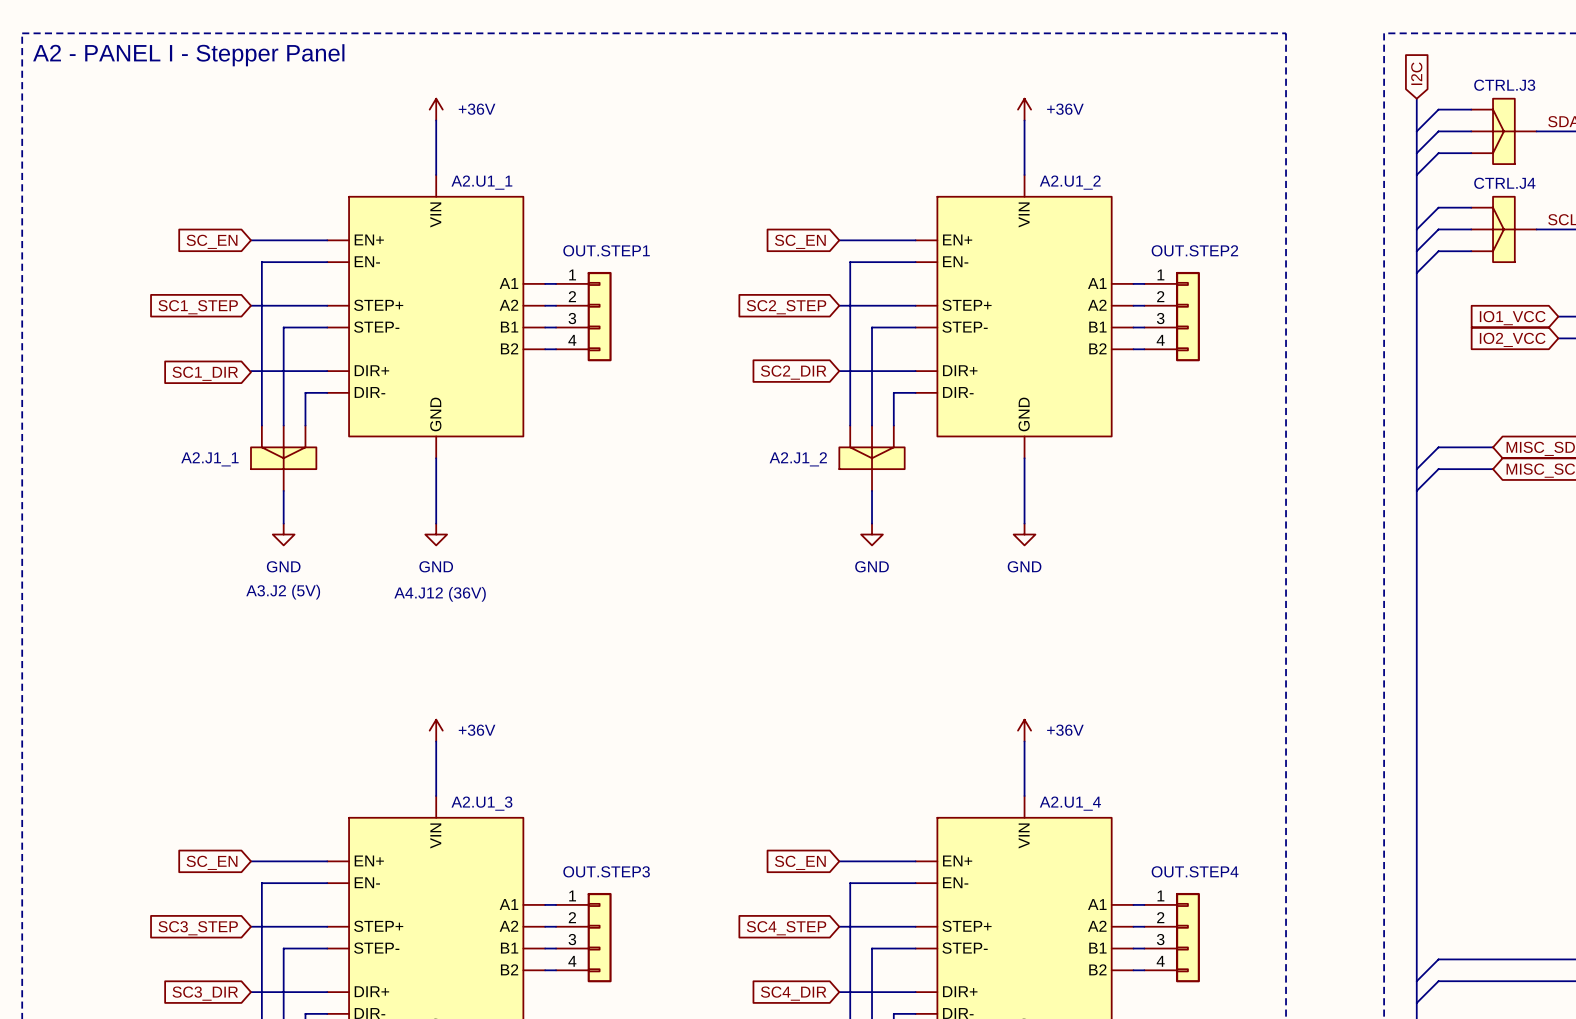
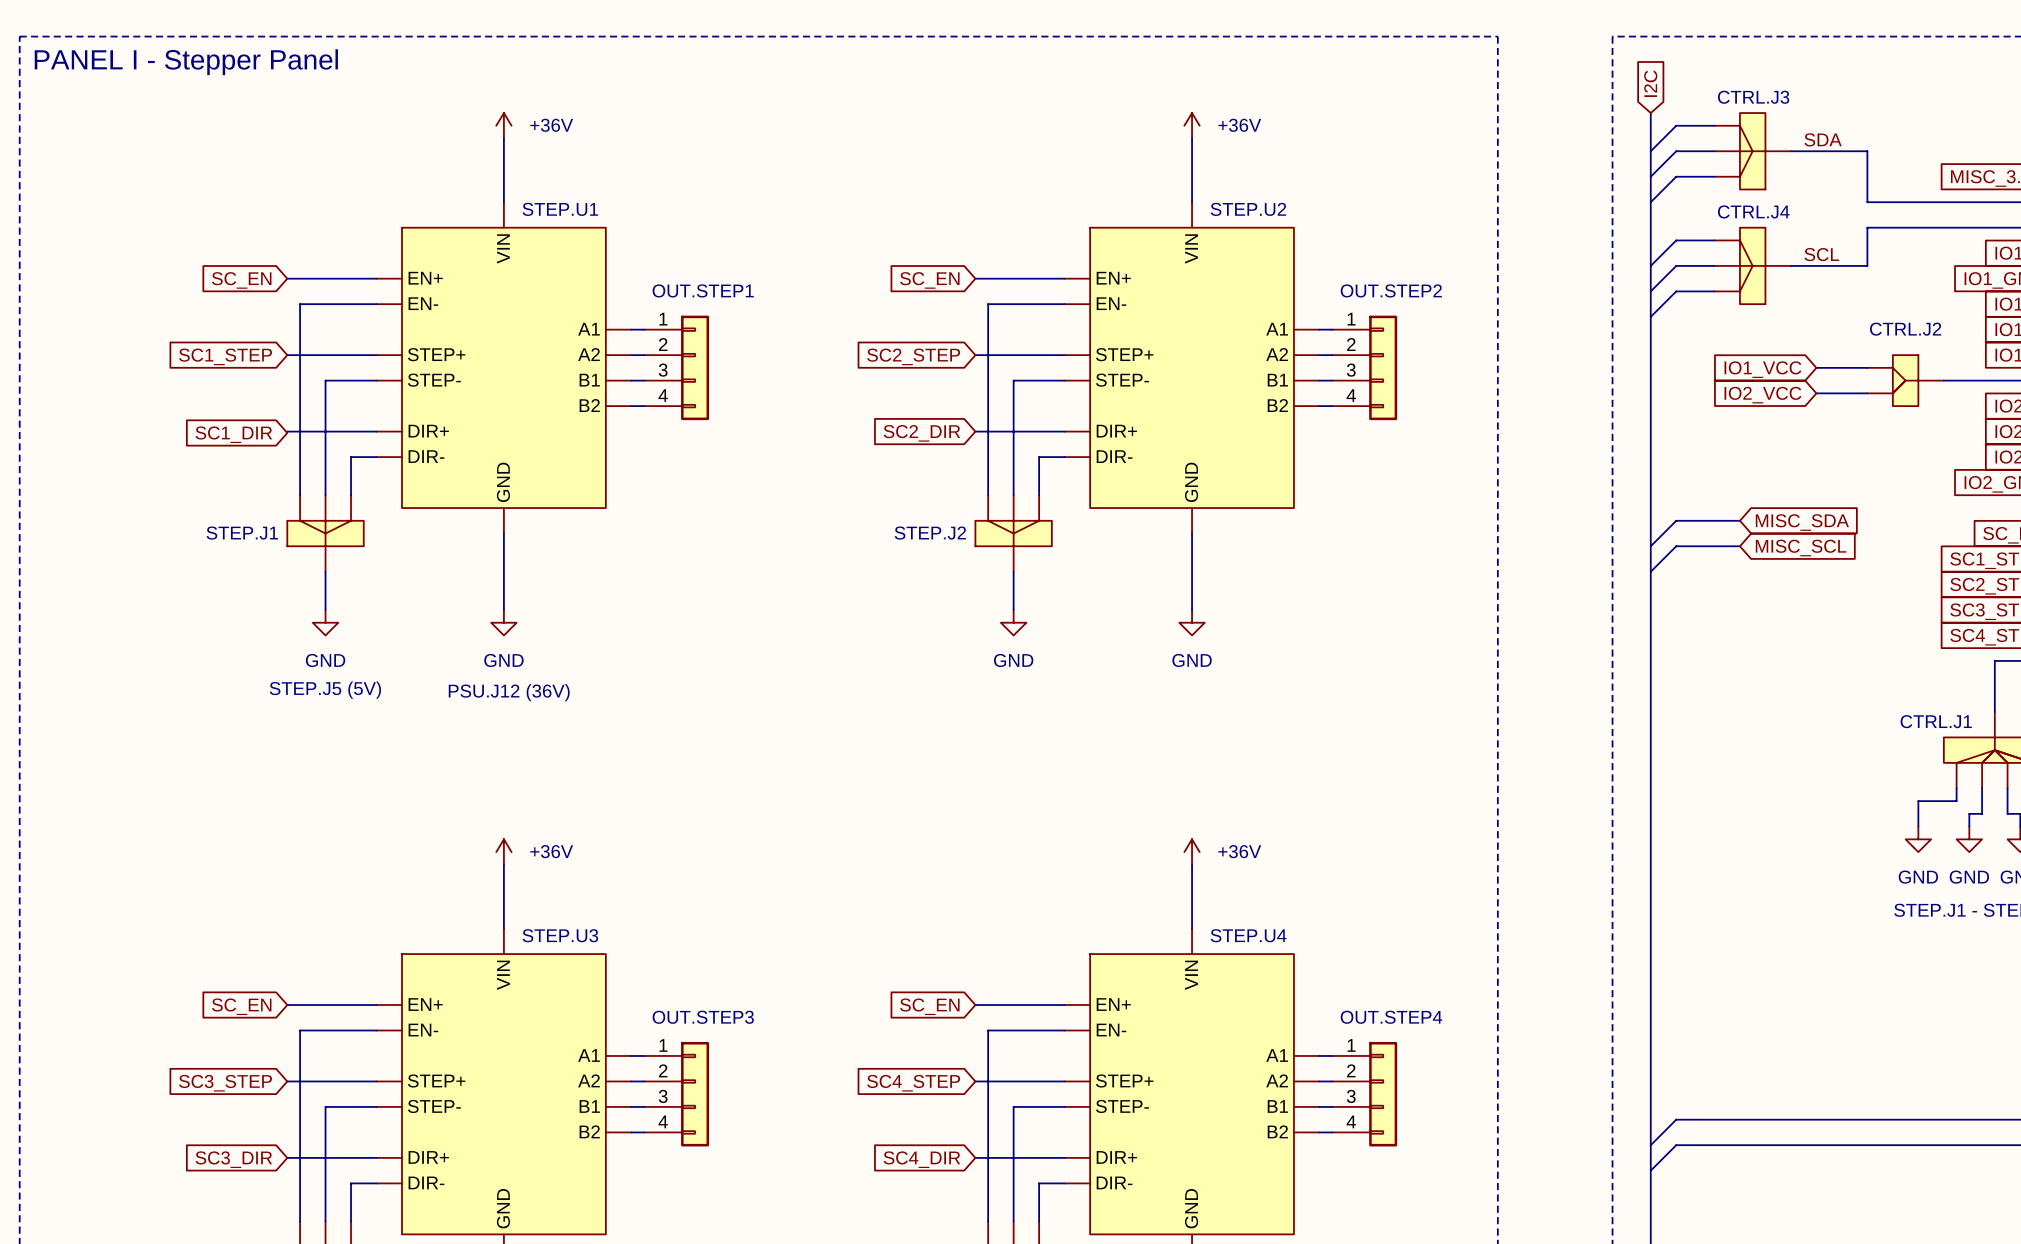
text: A2 - PANEL I - Stepper Panel (188, 55) -> PANEL I - Stepper Panel (186, 62)
A2.U1_1 name: A2.U1_1 (481, 182) -> STEP.U1 (560, 209)
A2.U1_2 name: A2.U1_2 (1070, 182) -> STEP.U2 (1248, 209)
A2.J1_1 name: A2.J1_1 (209, 459) -> STEP.J1 (242, 533)
A2.J1_2 name: A2.J1_2 (798, 459) -> STEP.J2 (930, 533)
text: A3.J2 (5V) (283, 592) -> STEP.J5 (5V) (325, 690)
text: A4.J12 (36V) (440, 594) -> PSU.J12 (36V) (509, 692)
A2.U1_3 name: A2.U1_3 (481, 803) -> STEP.U3 (560, 935)
A2.U1_4 name: A2.U1_4 (1070, 803) -> STEP.U4 (1248, 935)

